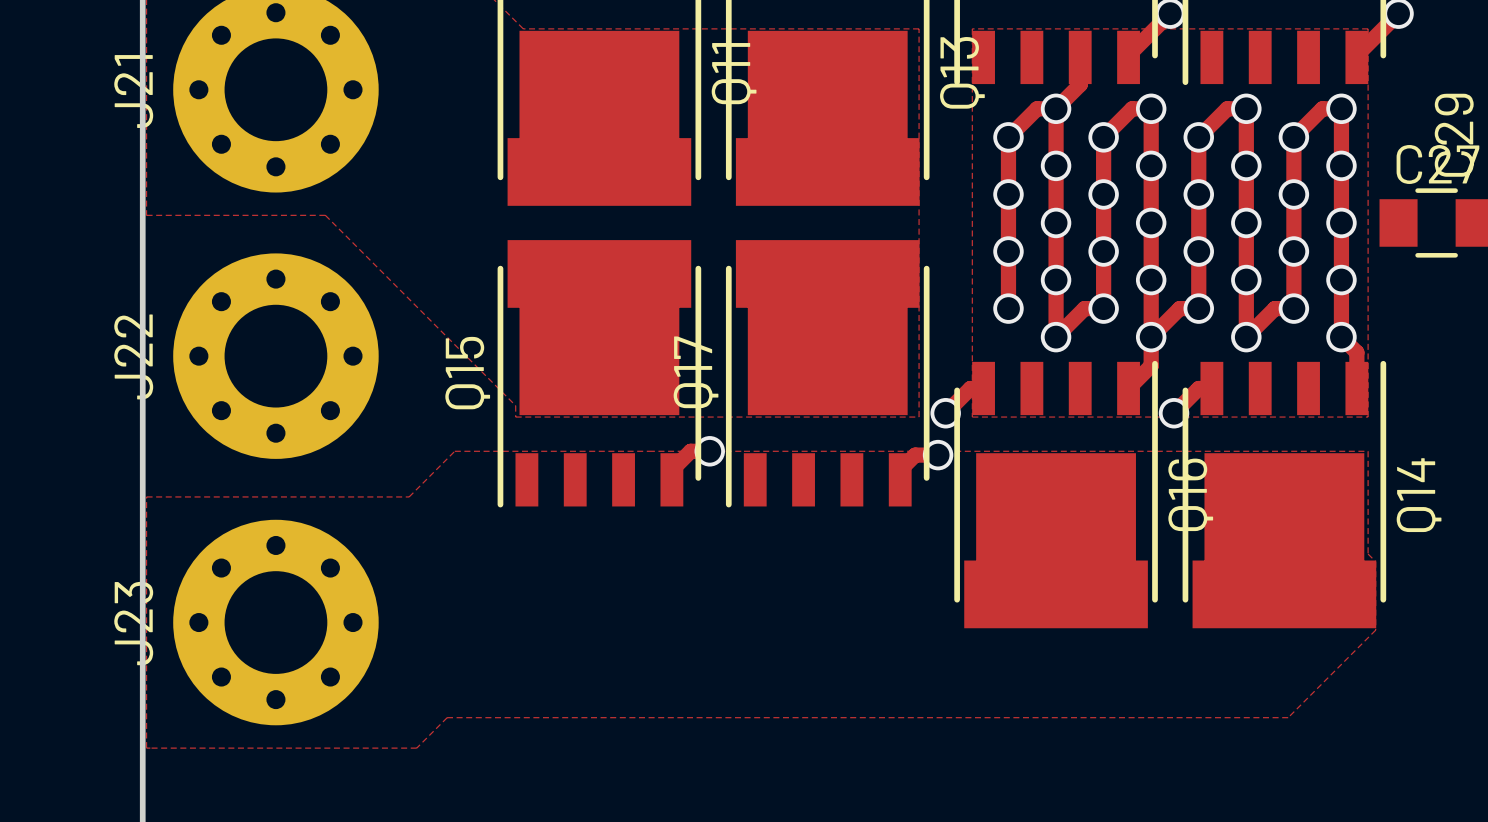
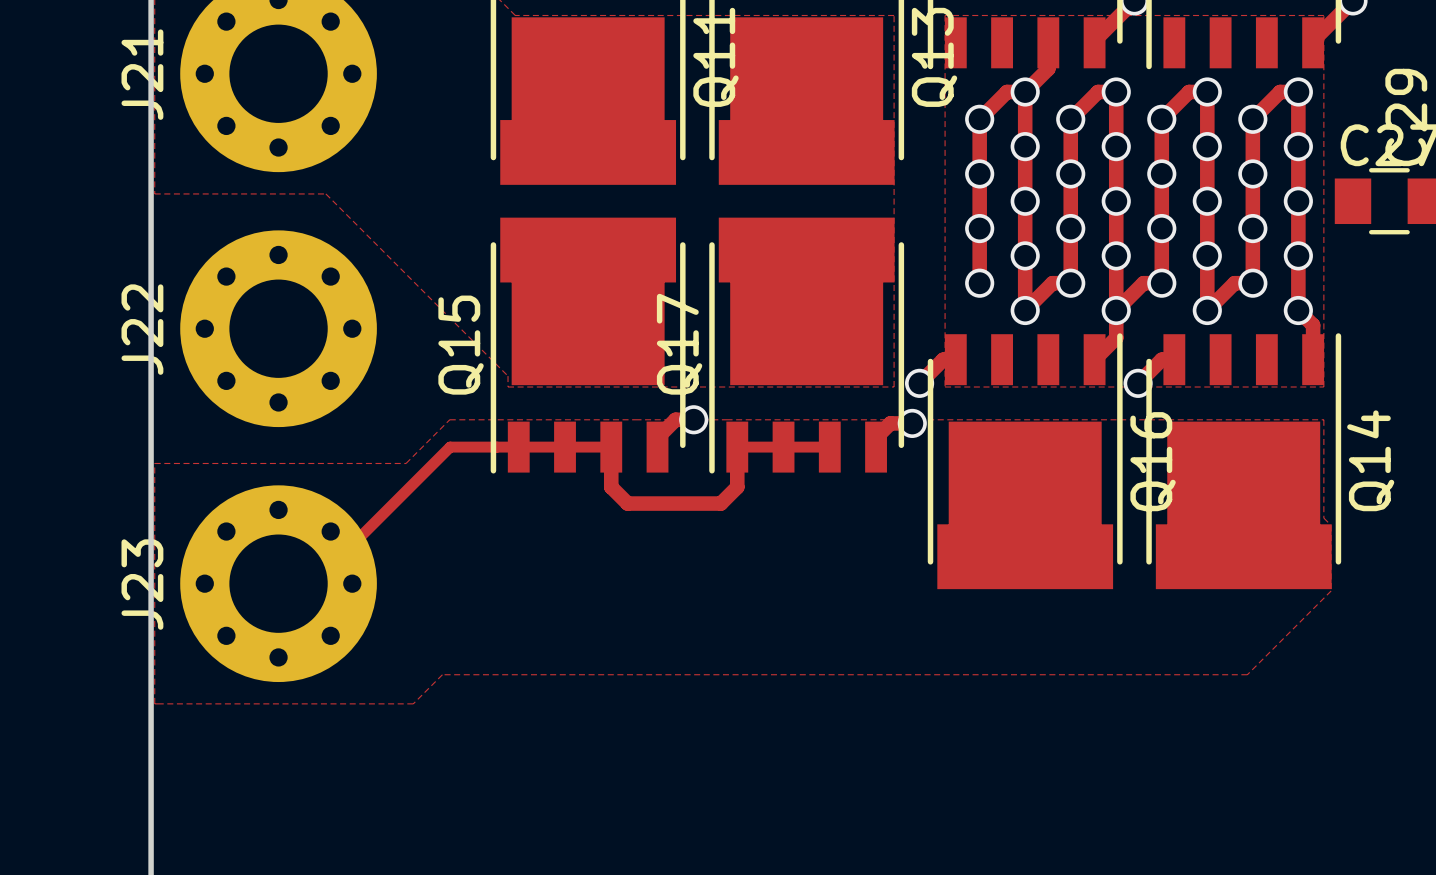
track: none -> (611, 447) (611, 487) (627, 503) (720, 503) (737, 487) (737, 447) (829, 447)
track: none -> (611, 447) (450, 447) (313, 583) (278, 583)

